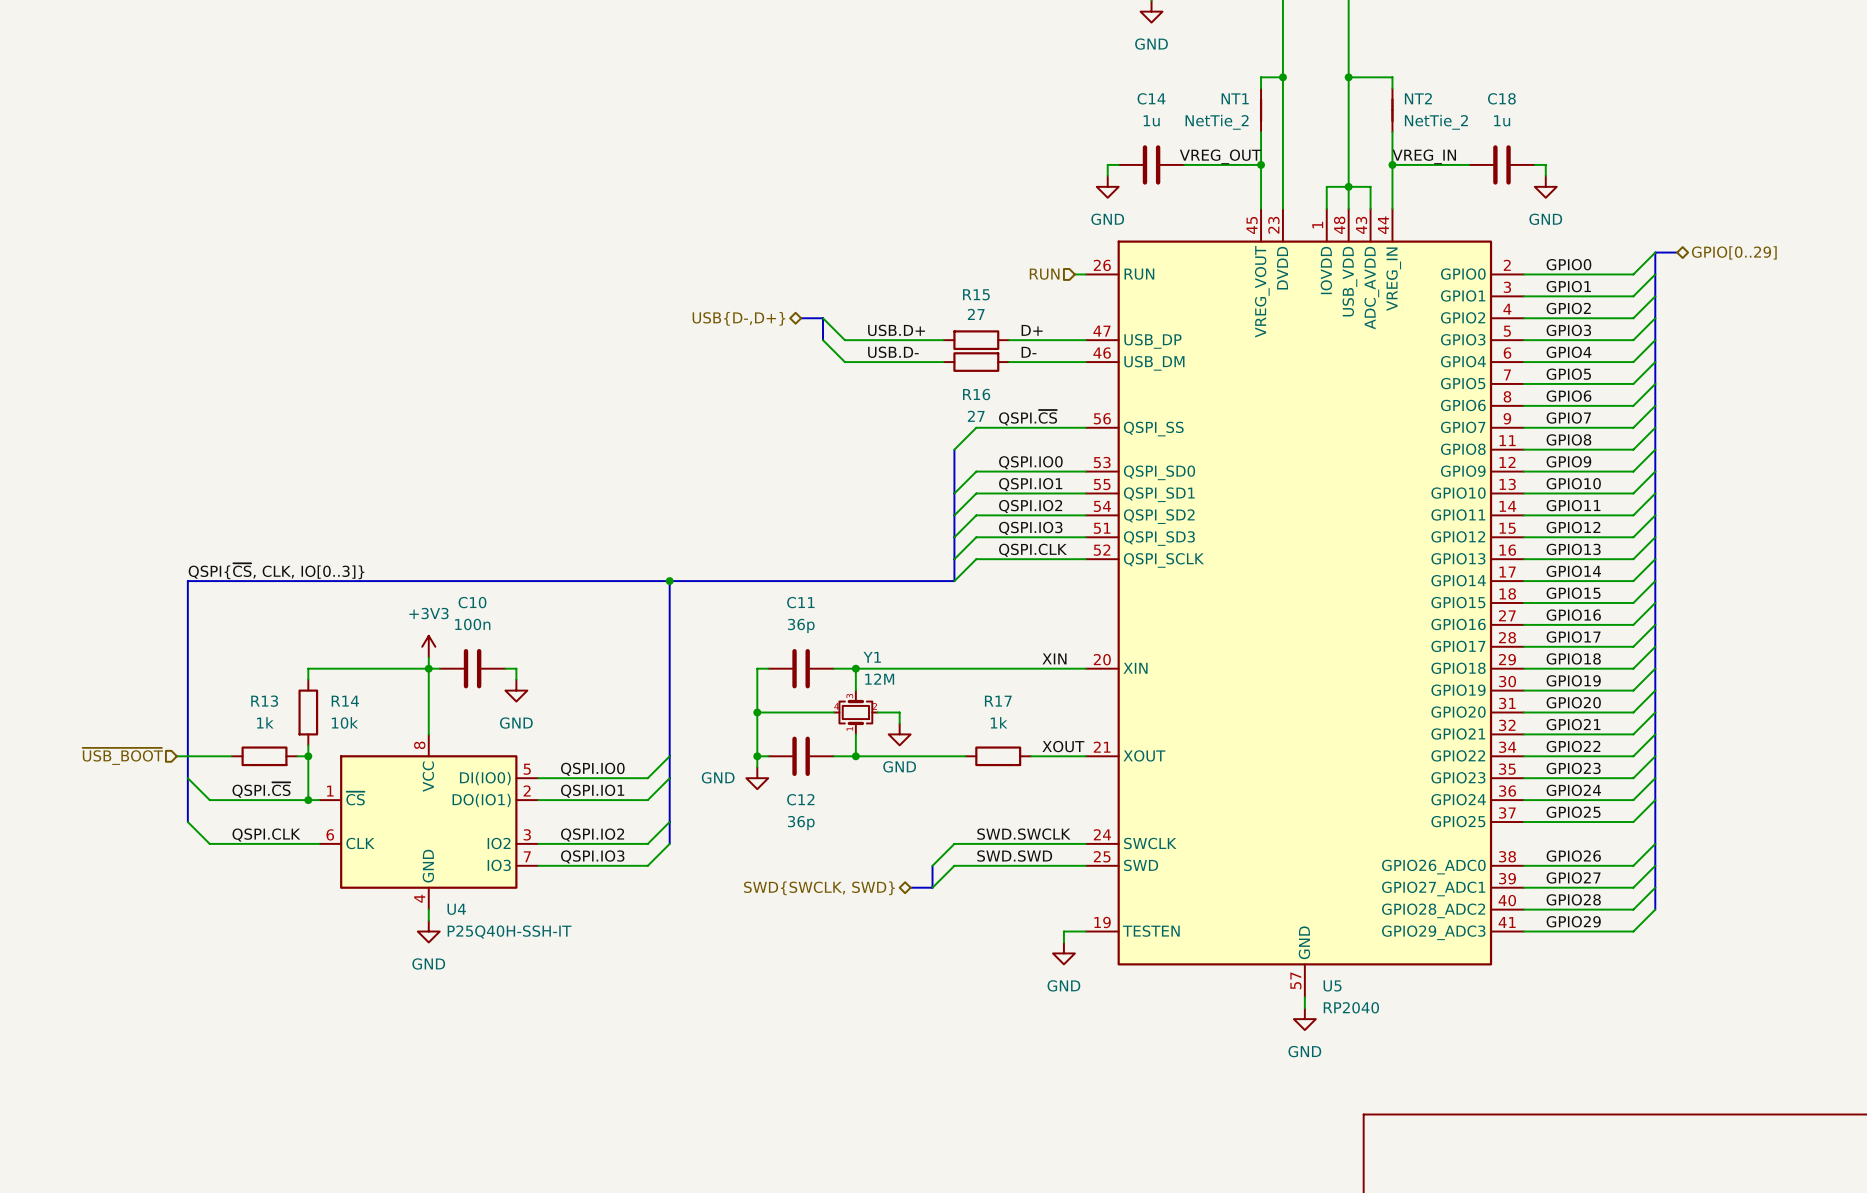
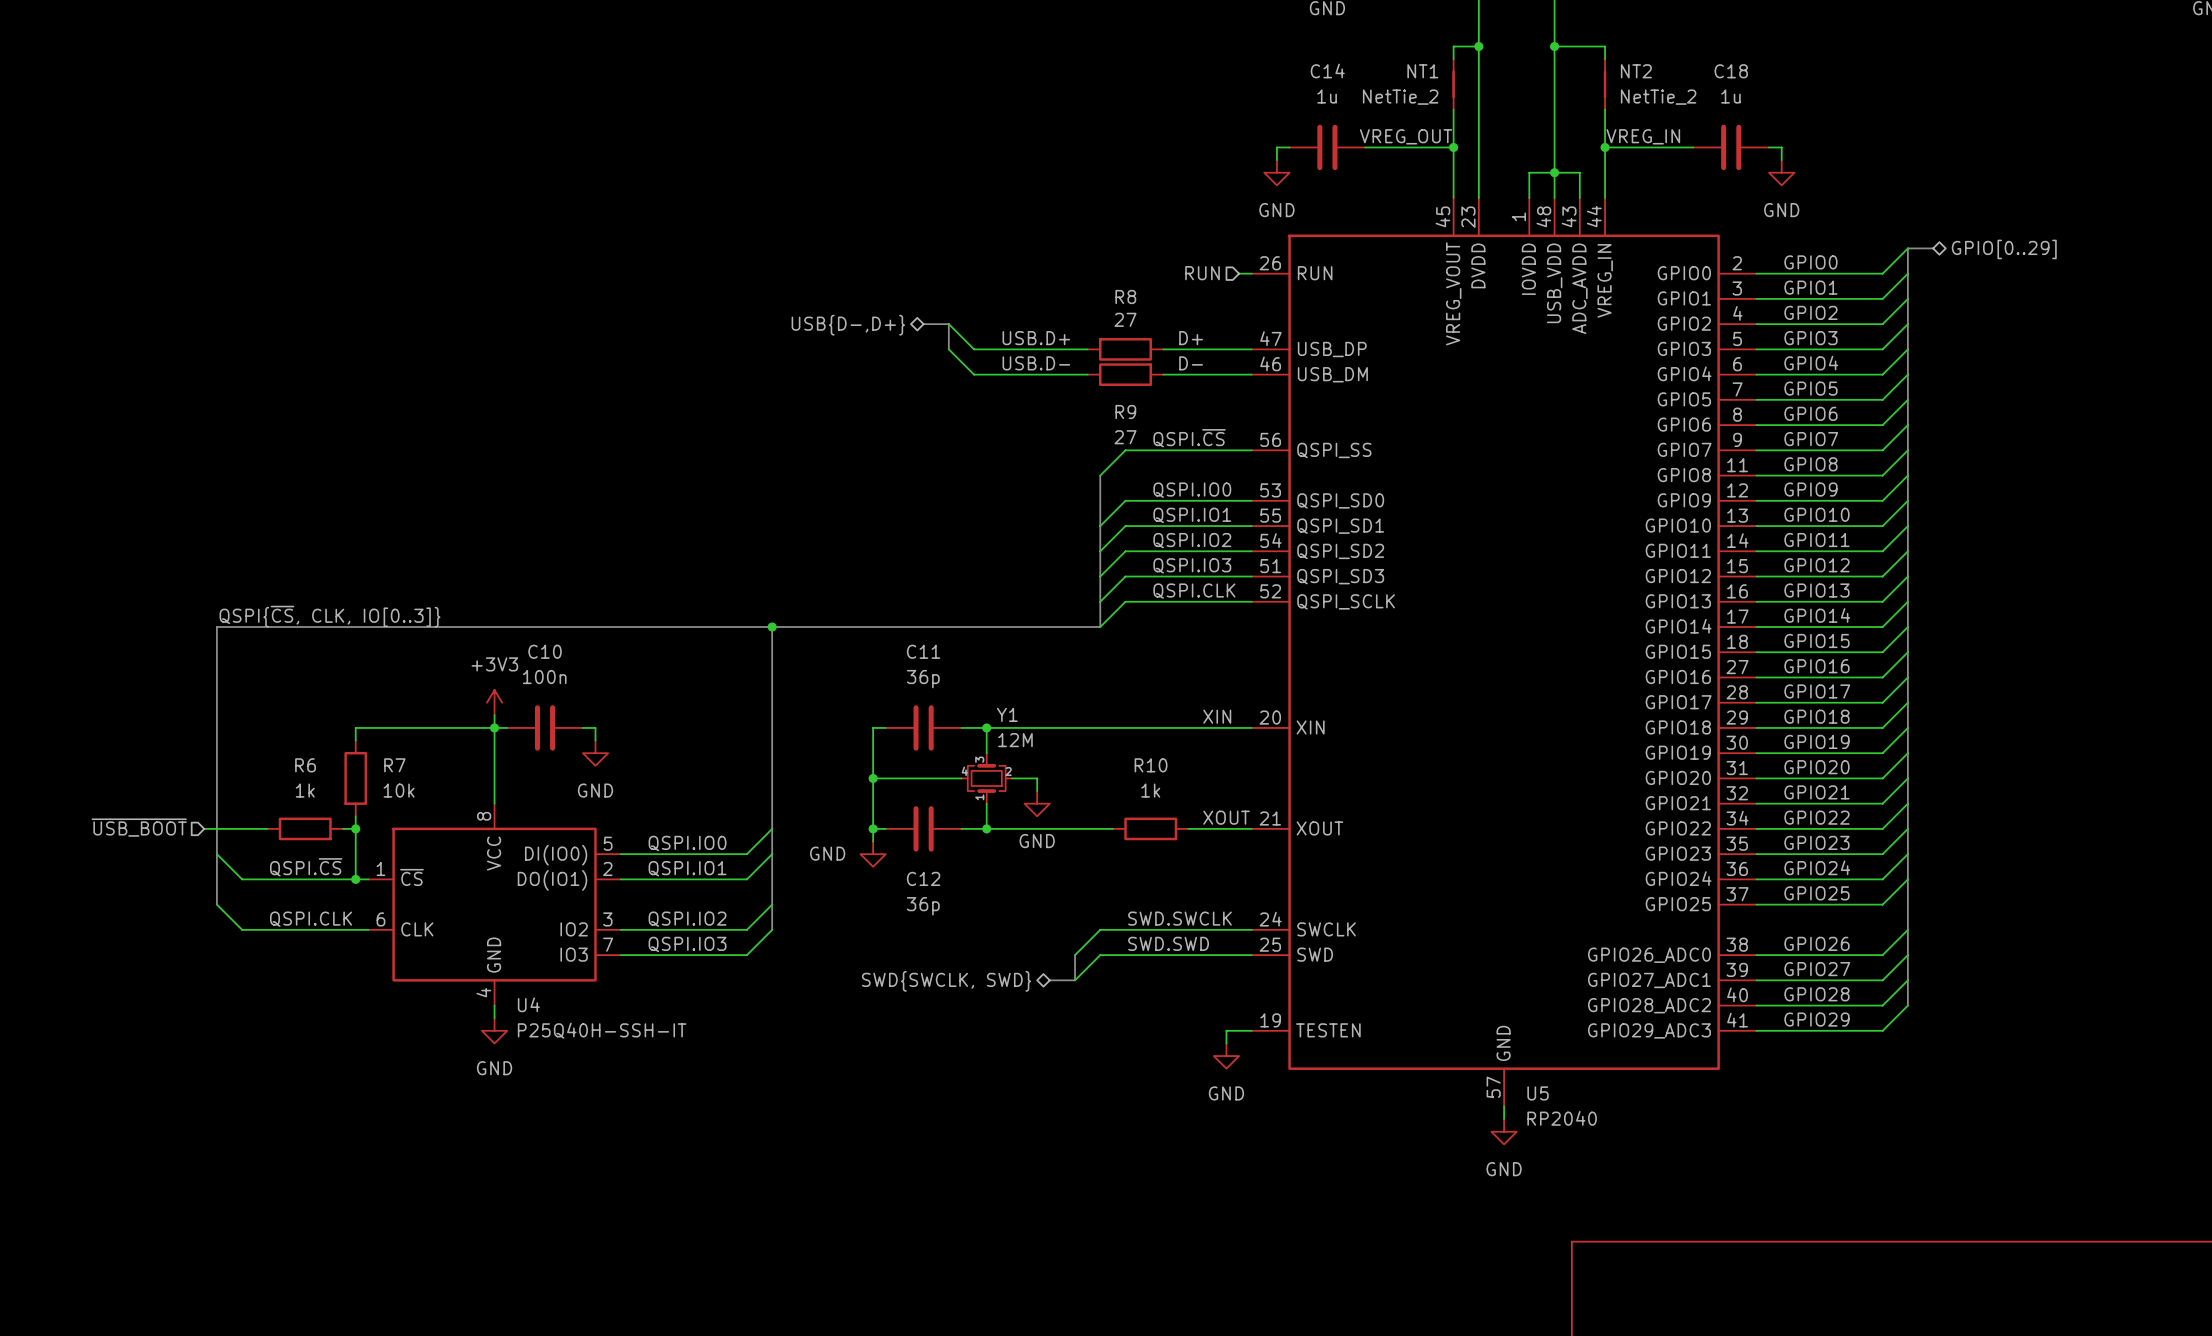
R15 name: R15 (976, 294) -> R8 (1125, 296)
R16 name: R16 (976, 394) -> R9 (1125, 412)
R13 name: R13 (264, 701) -> R6 (305, 765)
R14 name: R14 (345, 701) -> R7 (394, 765)
R17 name: R17 (998, 701) -> R10 (1151, 765)

